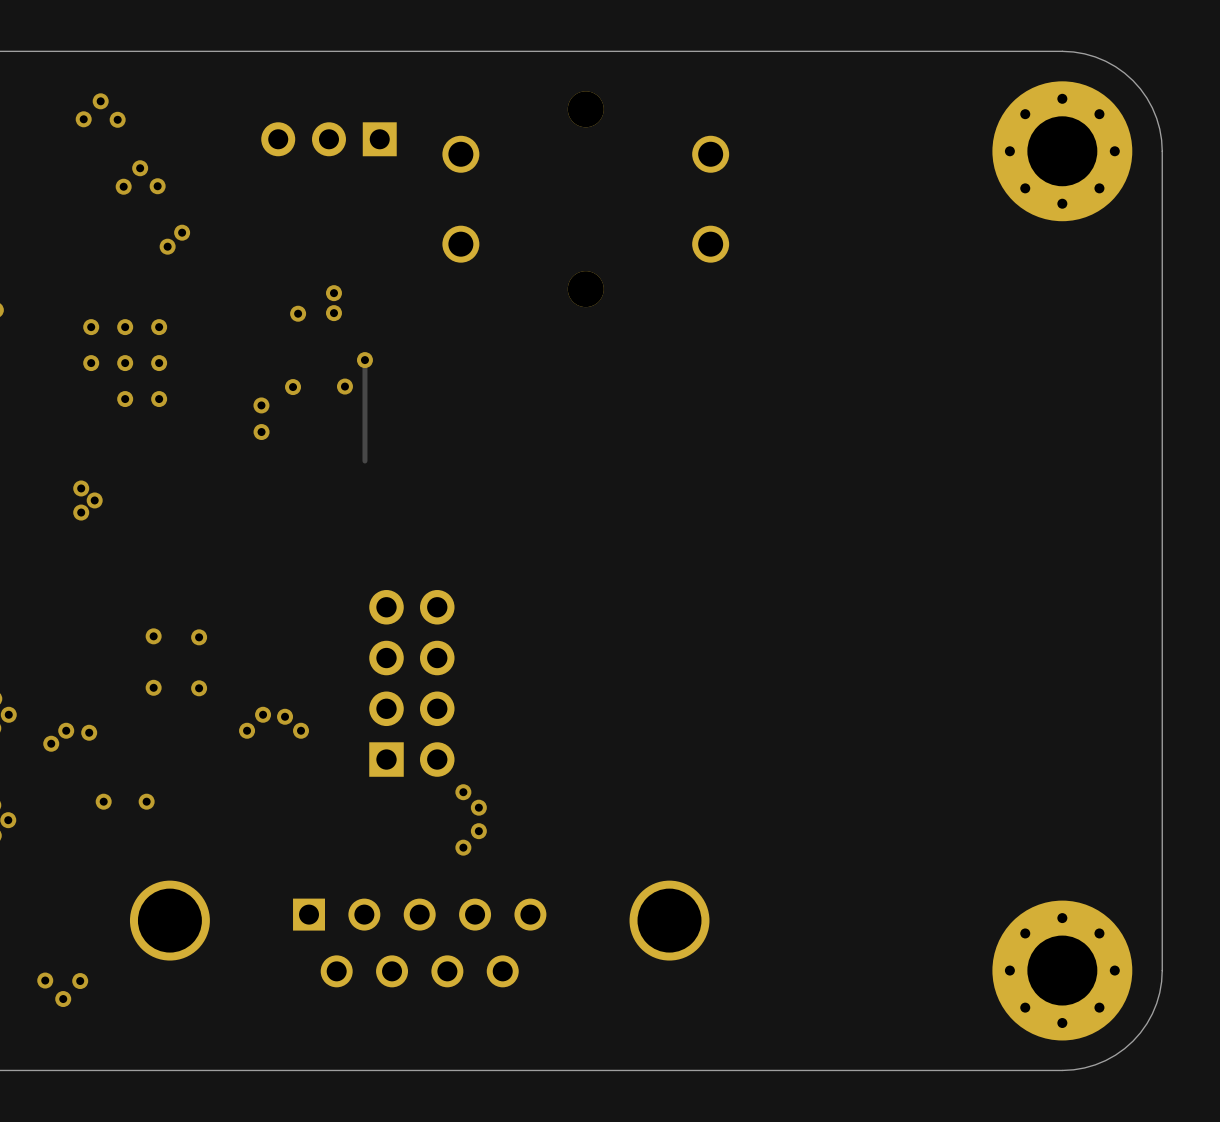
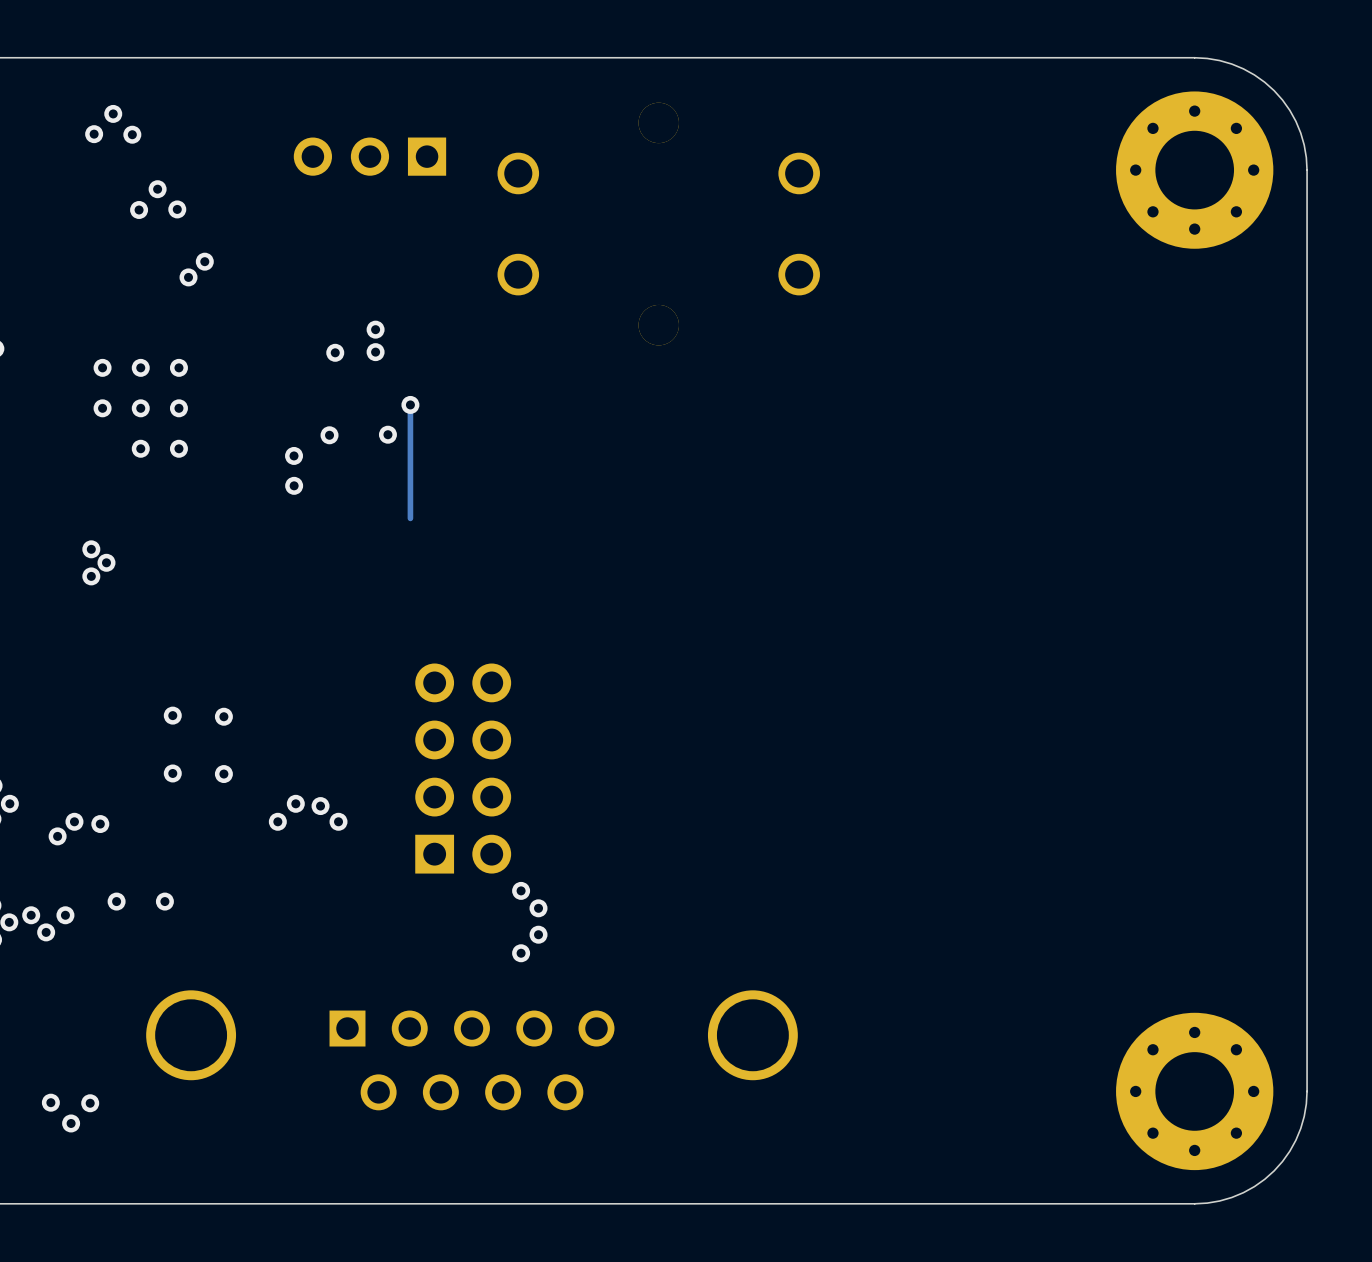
via: none -> (31, 915)
via: none -> (65, 915)
via: none -> (46, 932)

